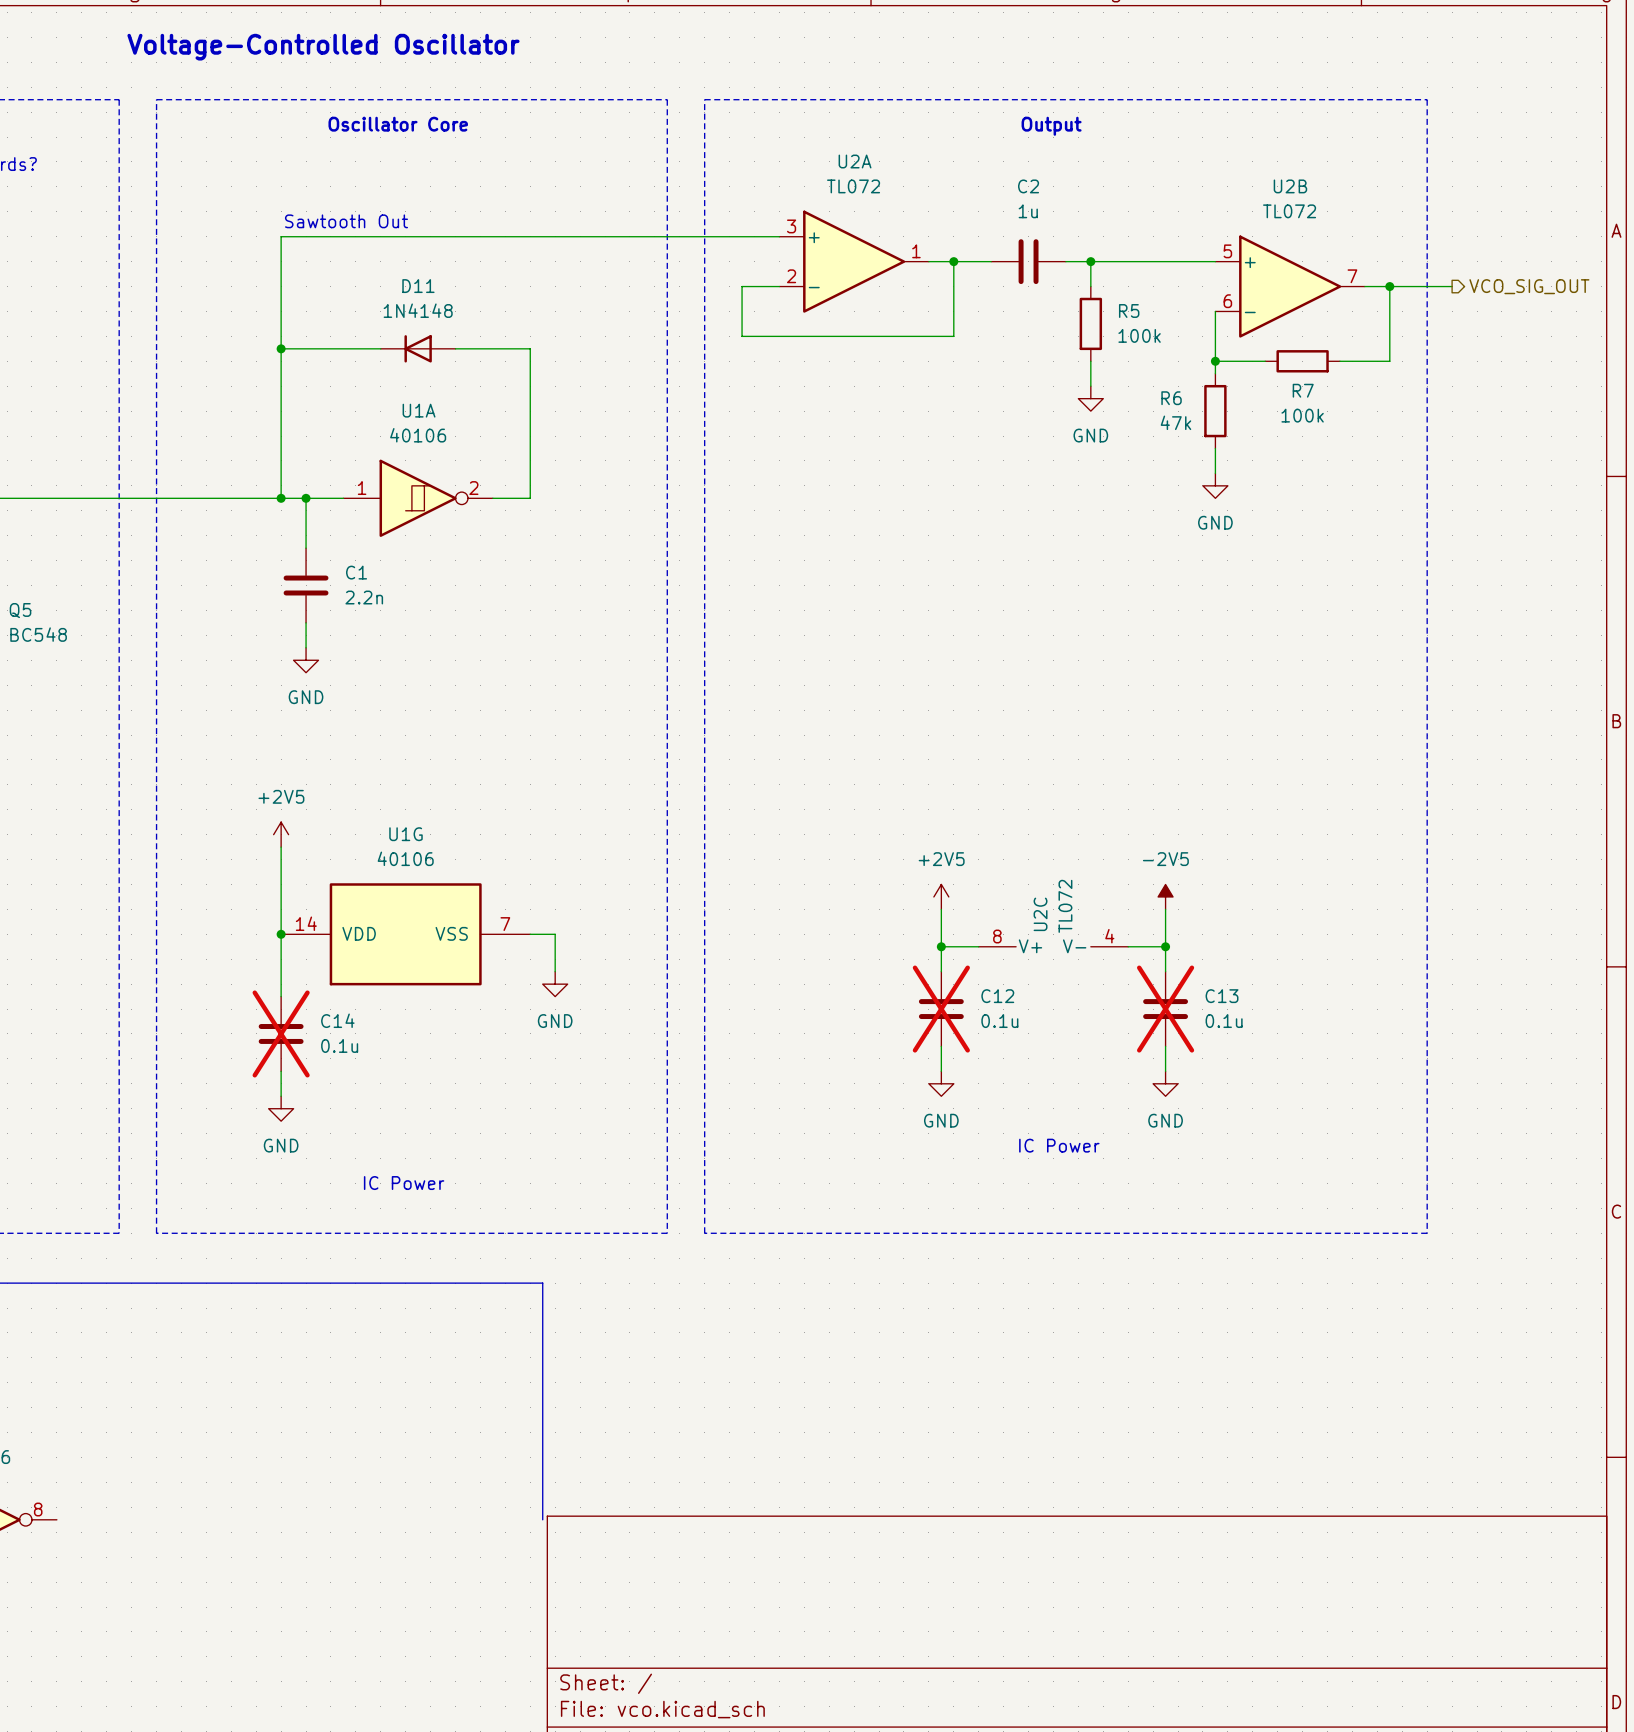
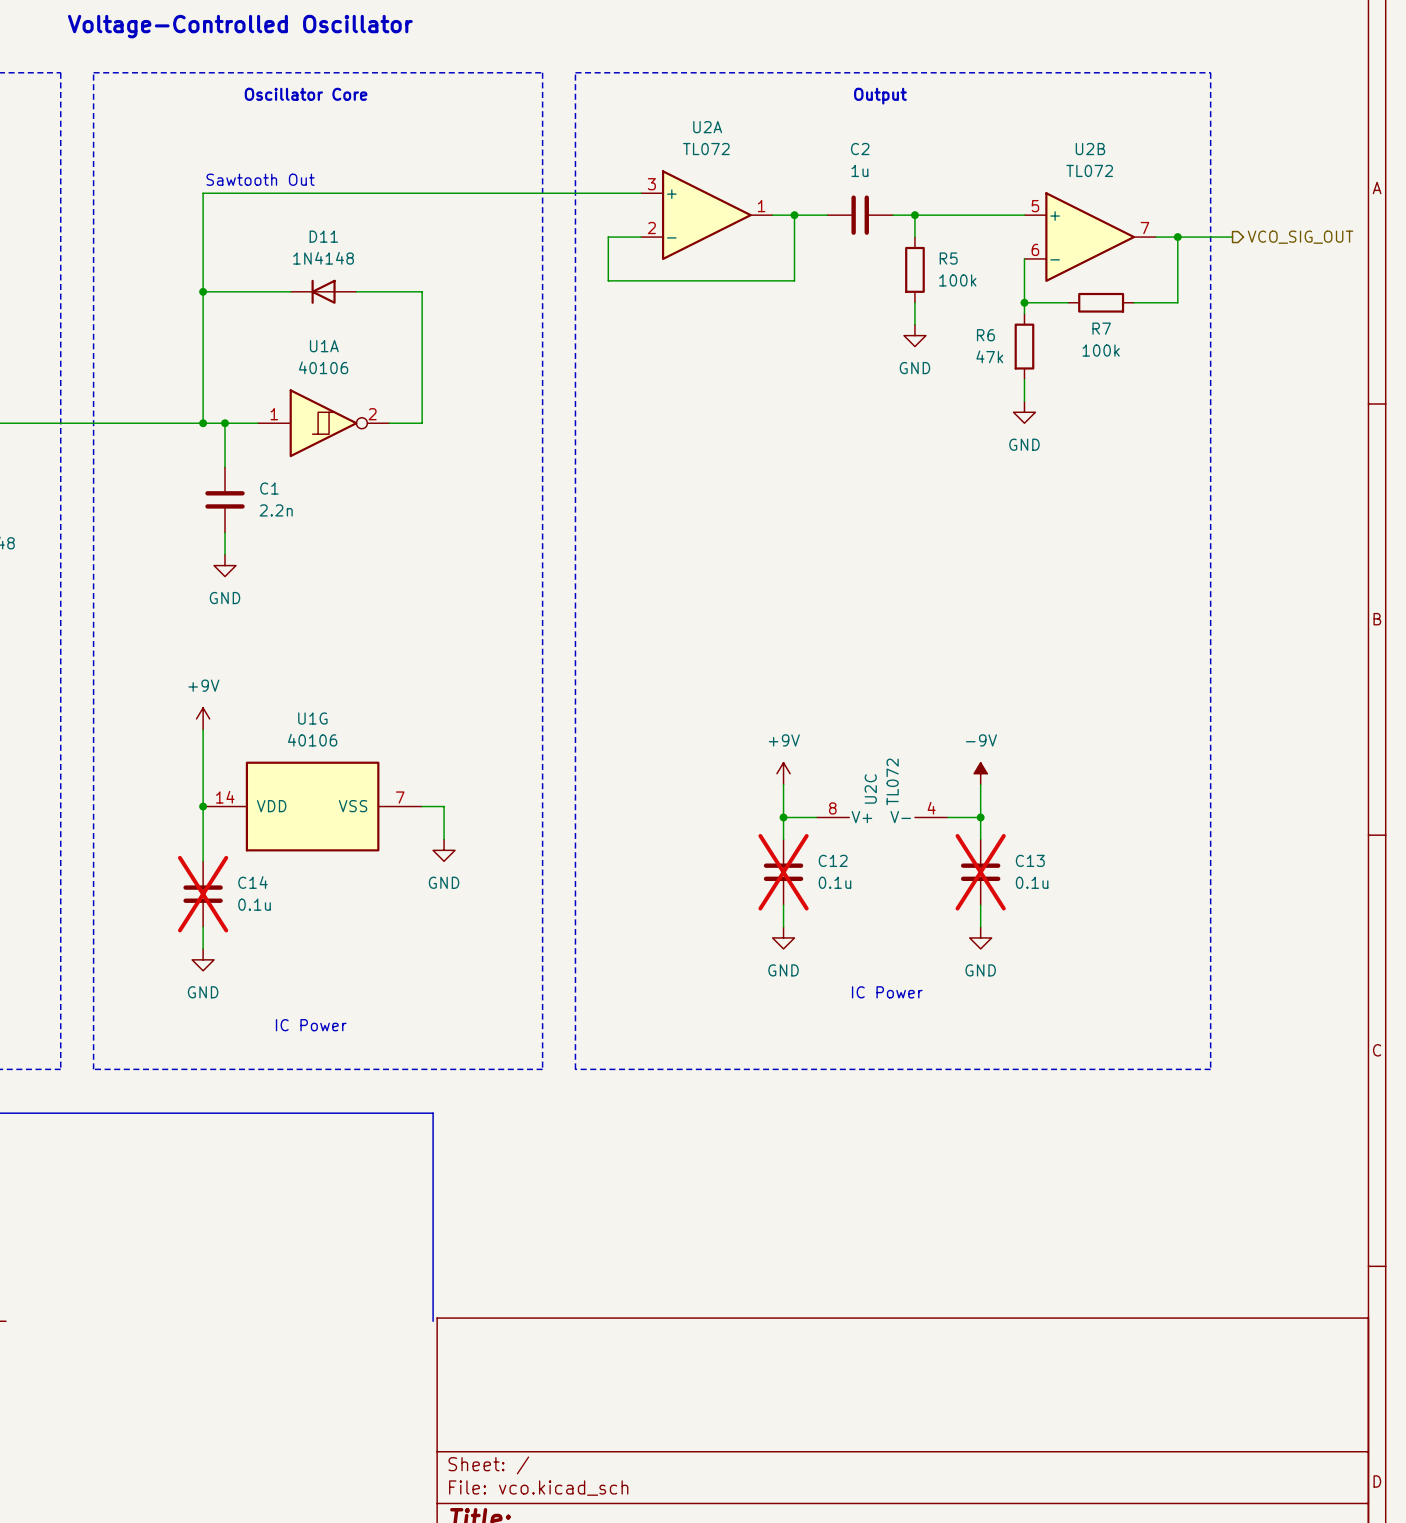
power symbol: +2V5 (281, 834) -> +9V (203, 718)
power symbol: +2V5 (941, 896) -> +9V (783, 773)
power symbol: -2V5 (1165, 896) -> -9V (980, 773)

